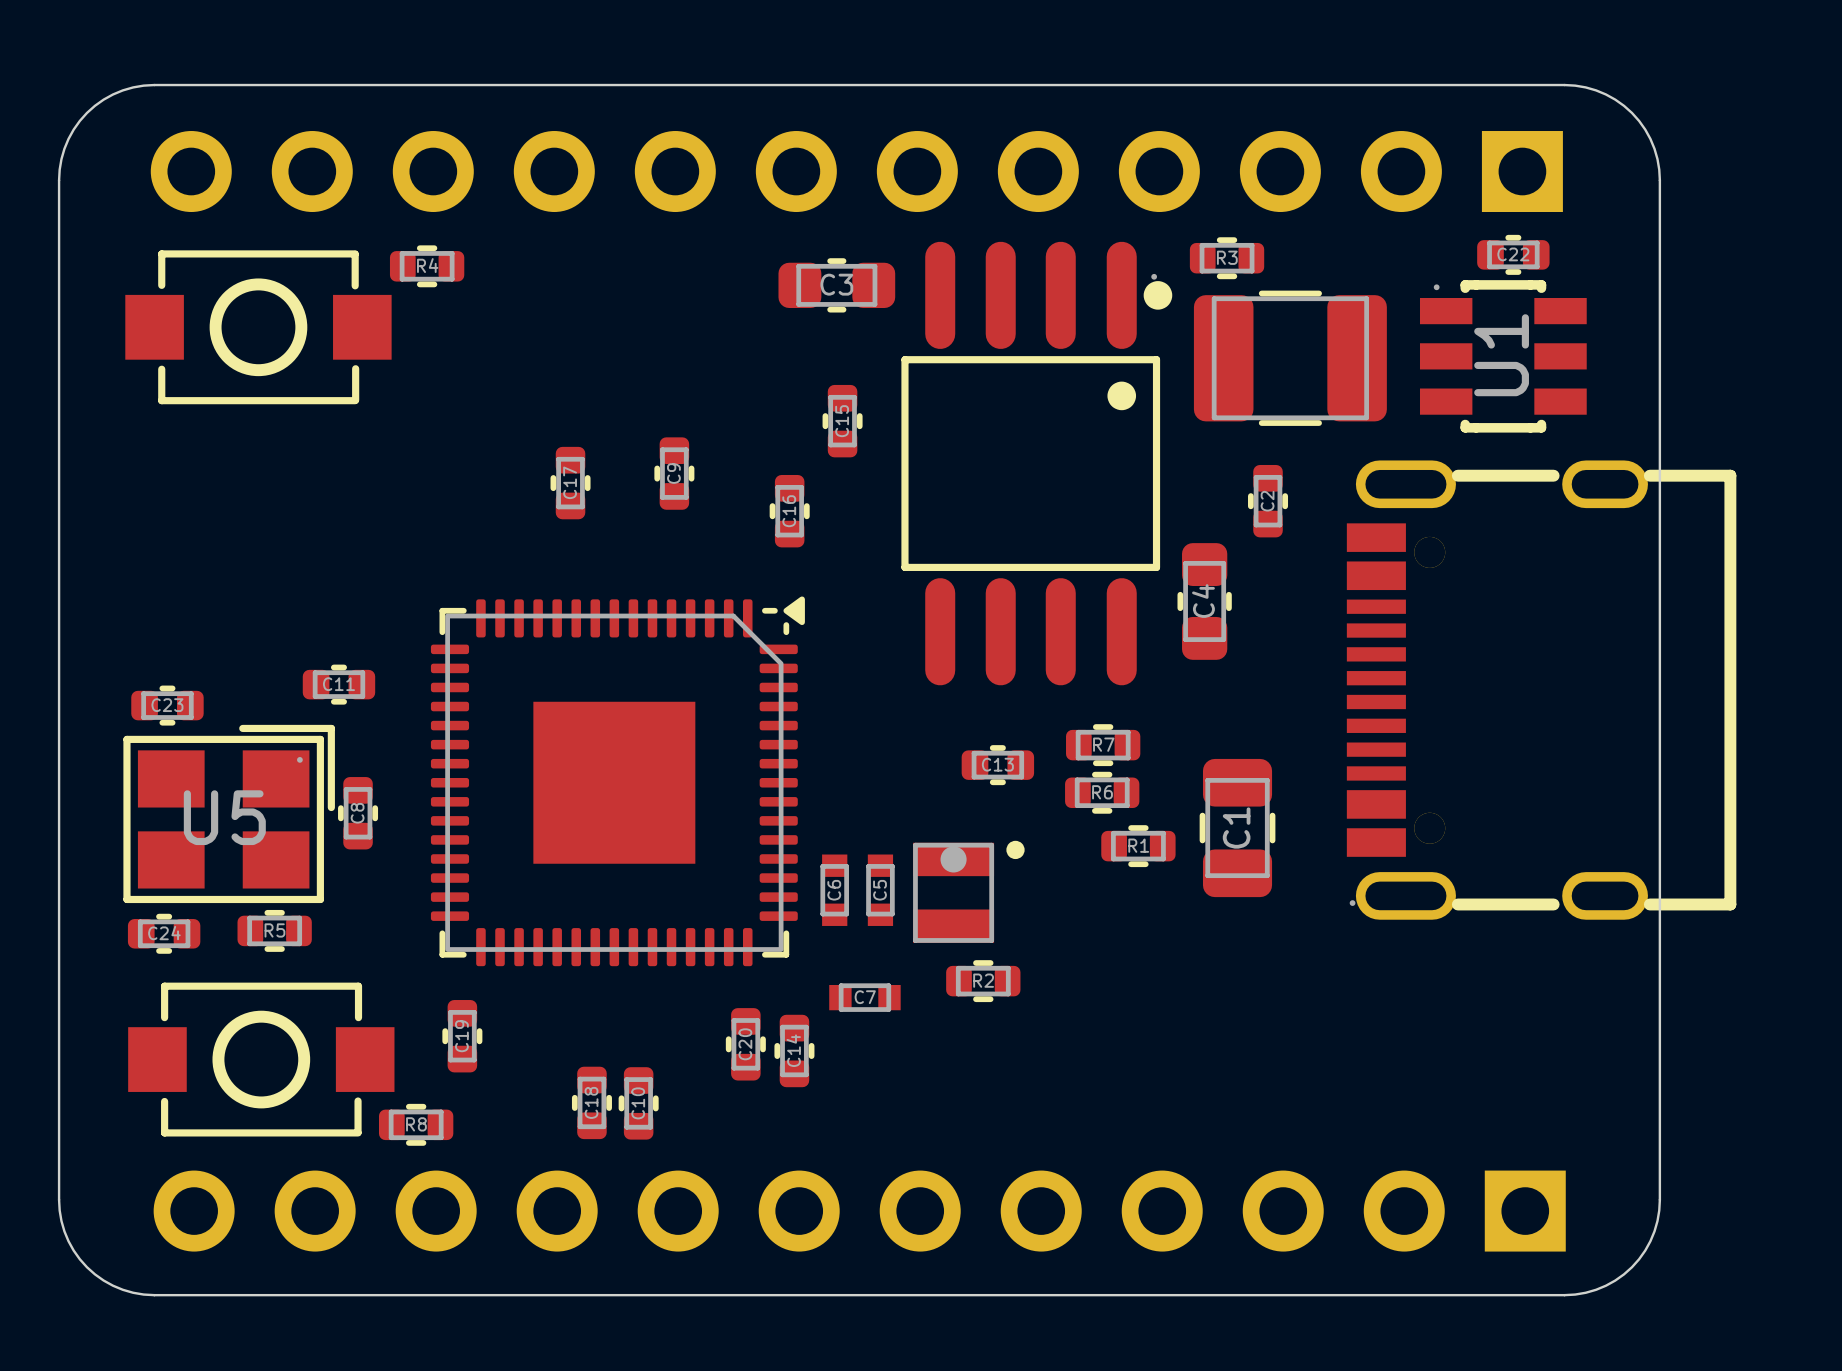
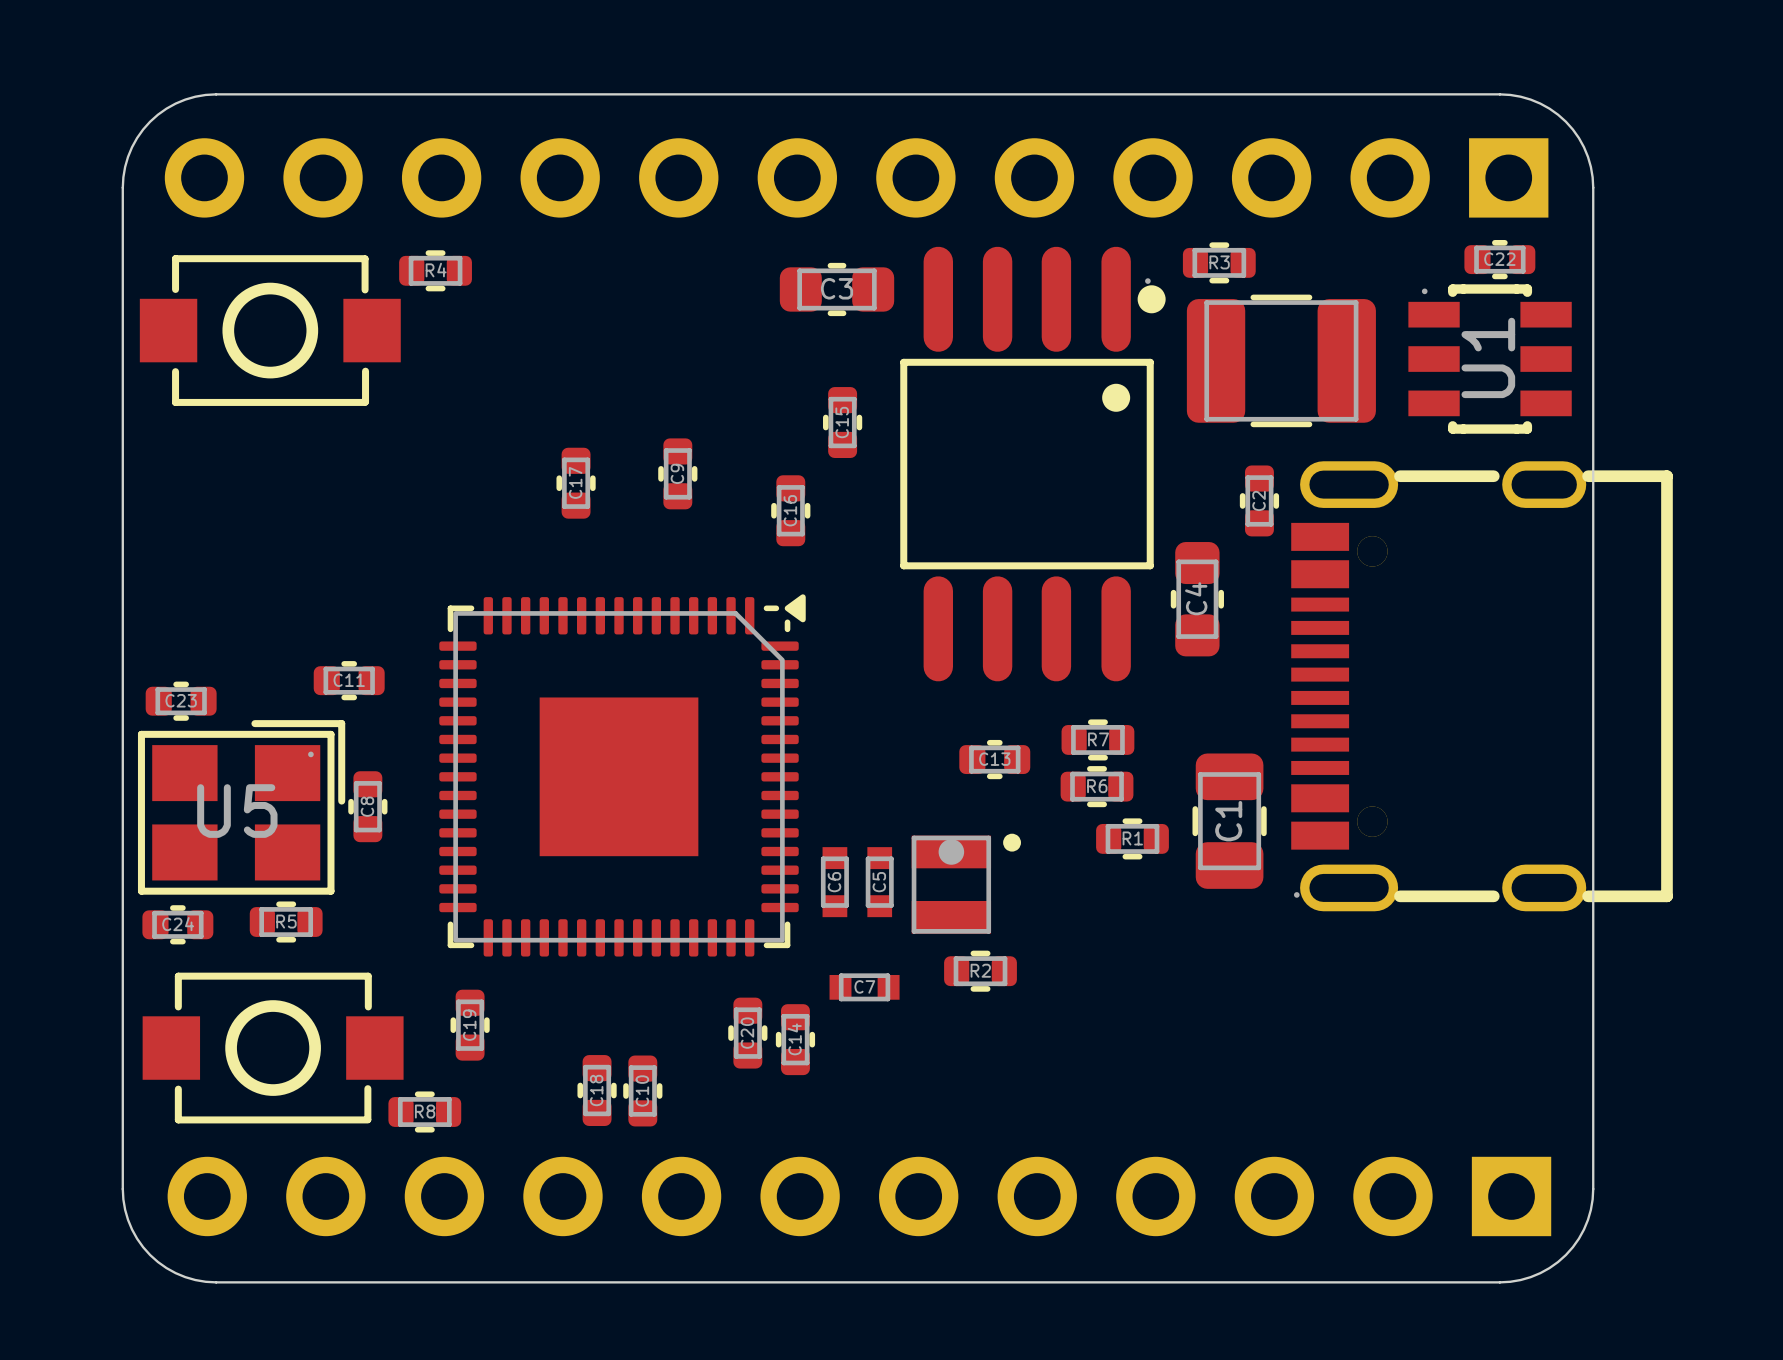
board edge: (154, 85) (1564, 85) (1596, 90) (1623, 105) (1639, 120) (1650, 138) (1657, 159) (1659, 180) (1659, 1199) (1654, 1231) (1639, 1259) (1623, 1274) (1605, 1285) (1585, 1292) (1564, 1295) (154, 1295) (122, 1289) (94, 1274) (79, 1259) (68, 1241) (61, 1221) (59, 1199) (59, 180) (61, 159) (68, 138) (86, 112) (113, 94) (133, 87) (154, 85) -> (216, 94) (185, 99) (166, 108) (150, 121) (137, 138) (128, 156) (122, 187) (122, 1189) (125, 1209) (132, 1229) (143, 1247) (157, 1262) (185, 1277) (216, 1282) (1499, 1282) (1520, 1280) (1540, 1273) (1558, 1262) (1572, 1247) (1587, 1219) (1593, 1189) (1593, 187) (1590, 166) (1583, 147) (1572, 129) (1558, 114) (1530, 99) (1499, 94) (216, 94)
part position: (1541, 690) -> (1482, 686)

